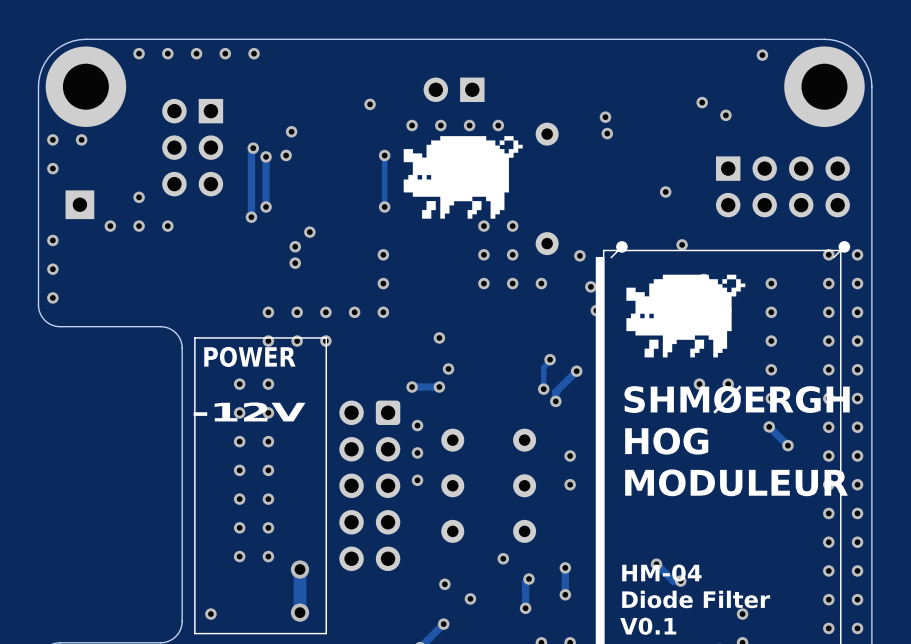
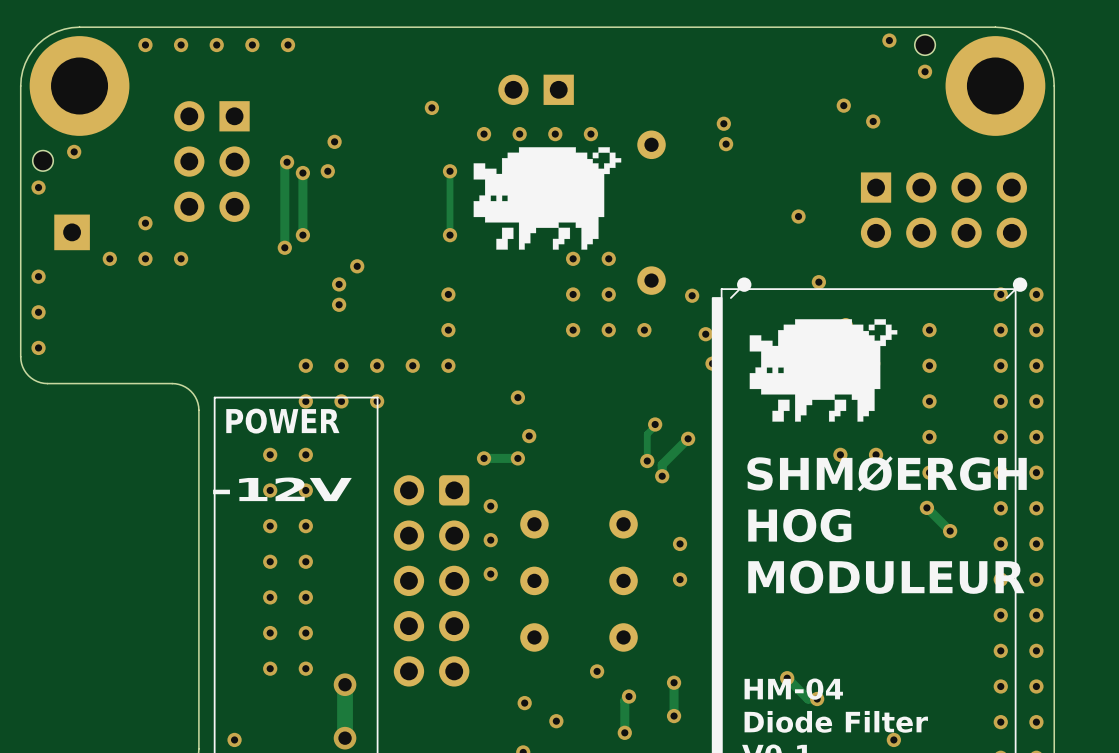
via: none -> (889, 40)
part: none -> (925, 45)
via: (762, 55) -> none
via: none -> (925, 71)
via: (52, 139) -> none
part: none -> (43, 160)

